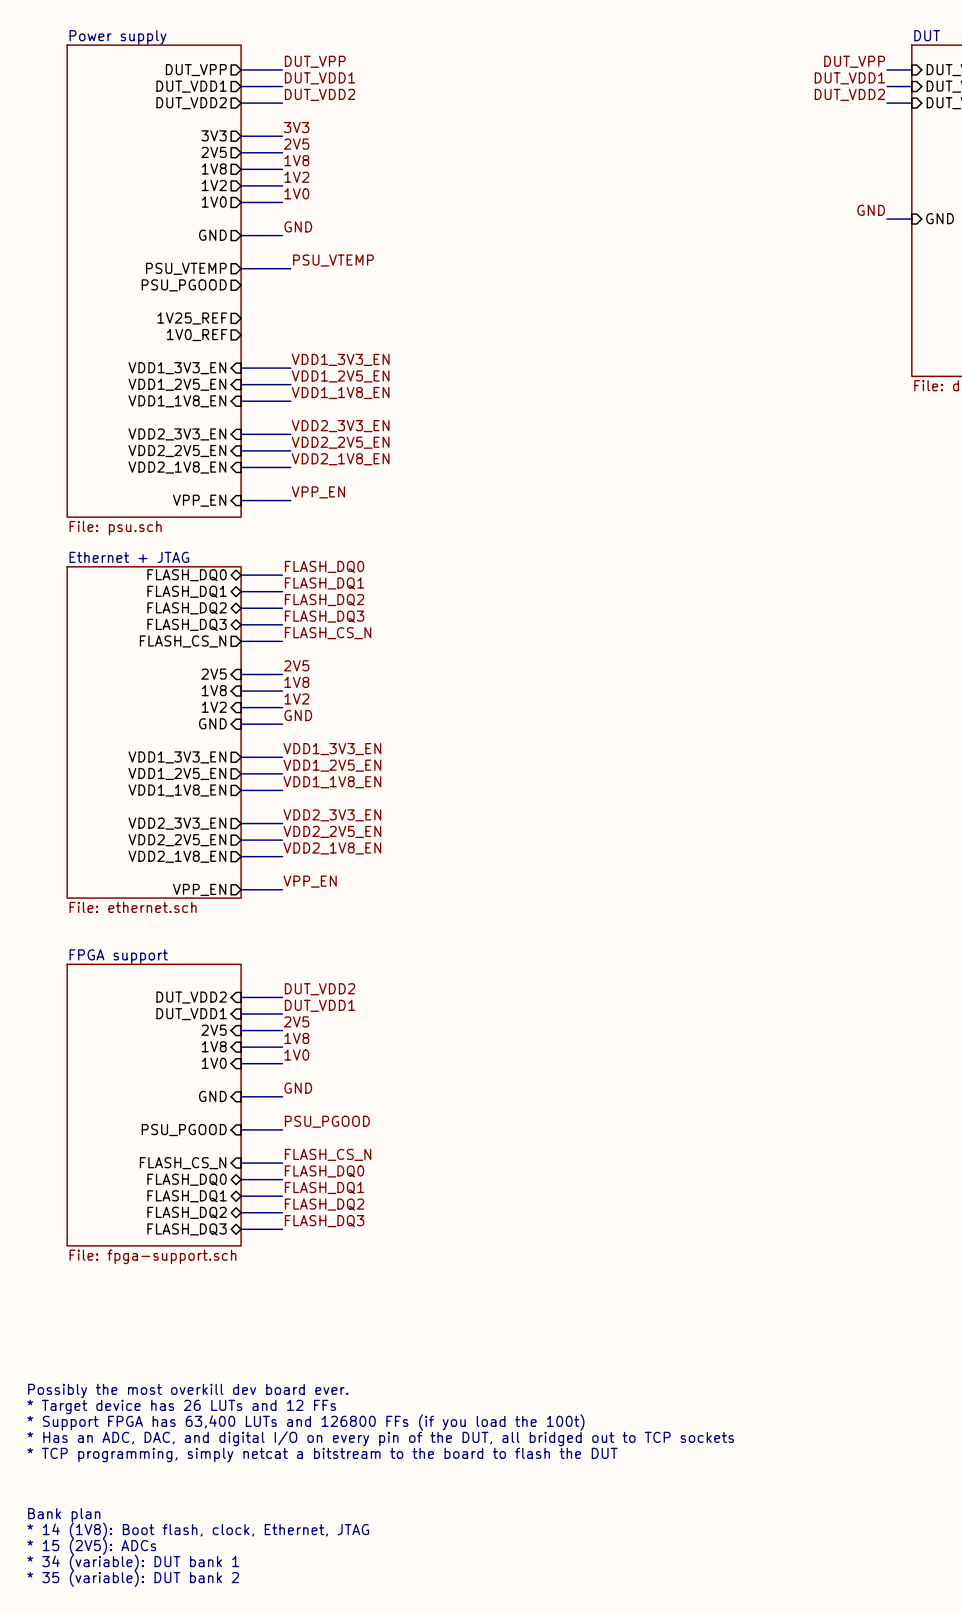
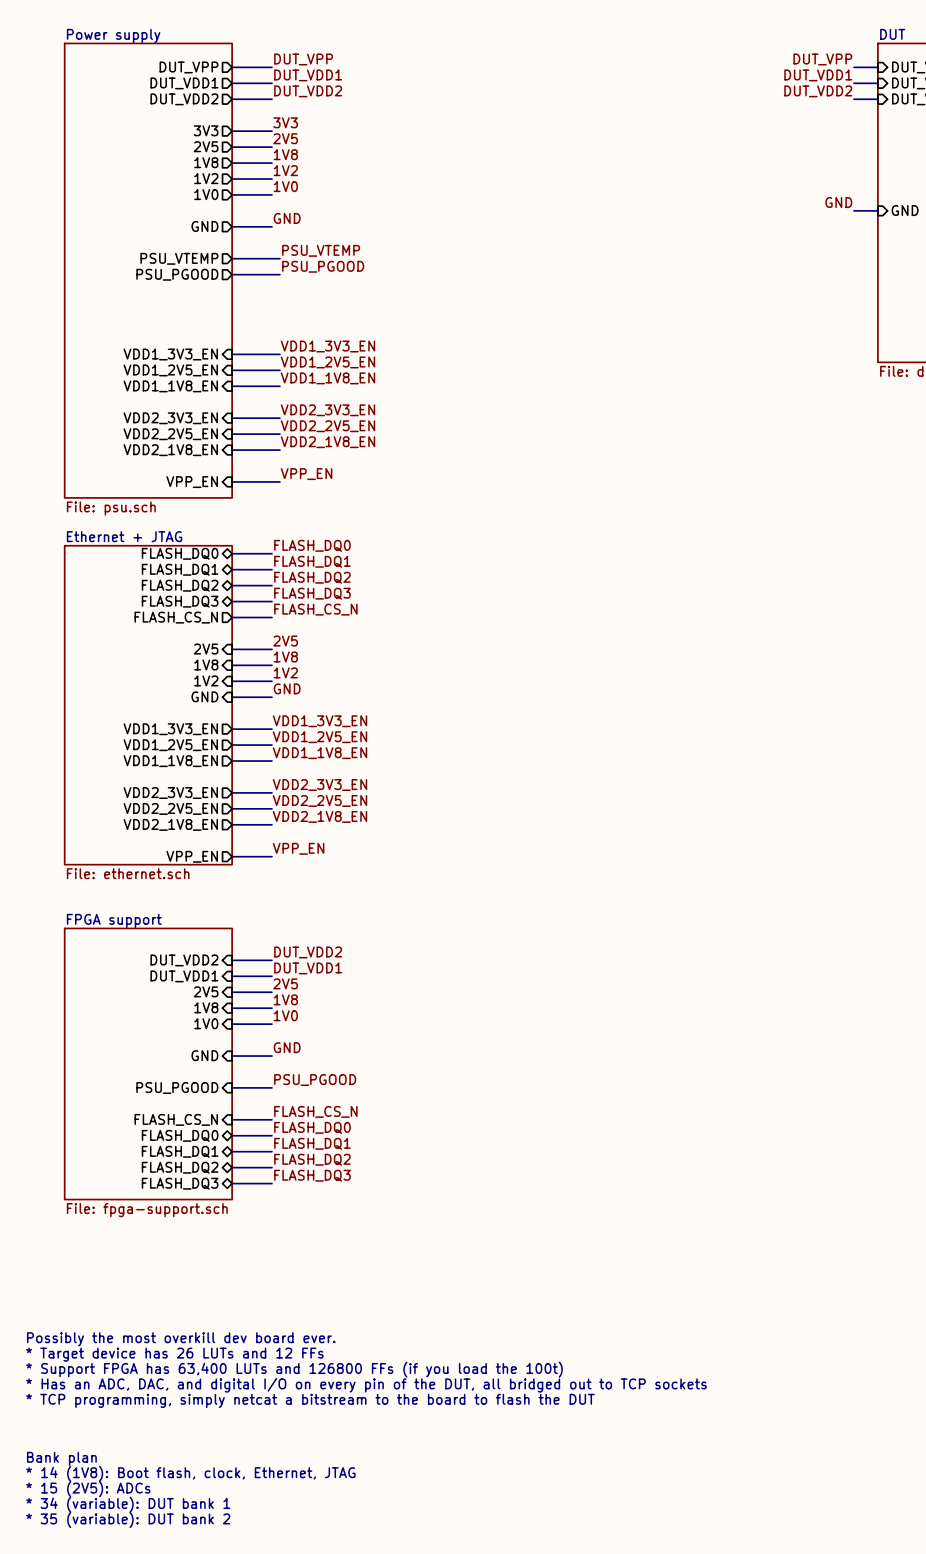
label: none -> PSU_PGOOD (323, 266)
wire: none -> (232, 274) (279, 274)
sheet pin: 1V25_REF (192, 318) -> none
sheet pin: 1V0_REF (197, 335) -> none

